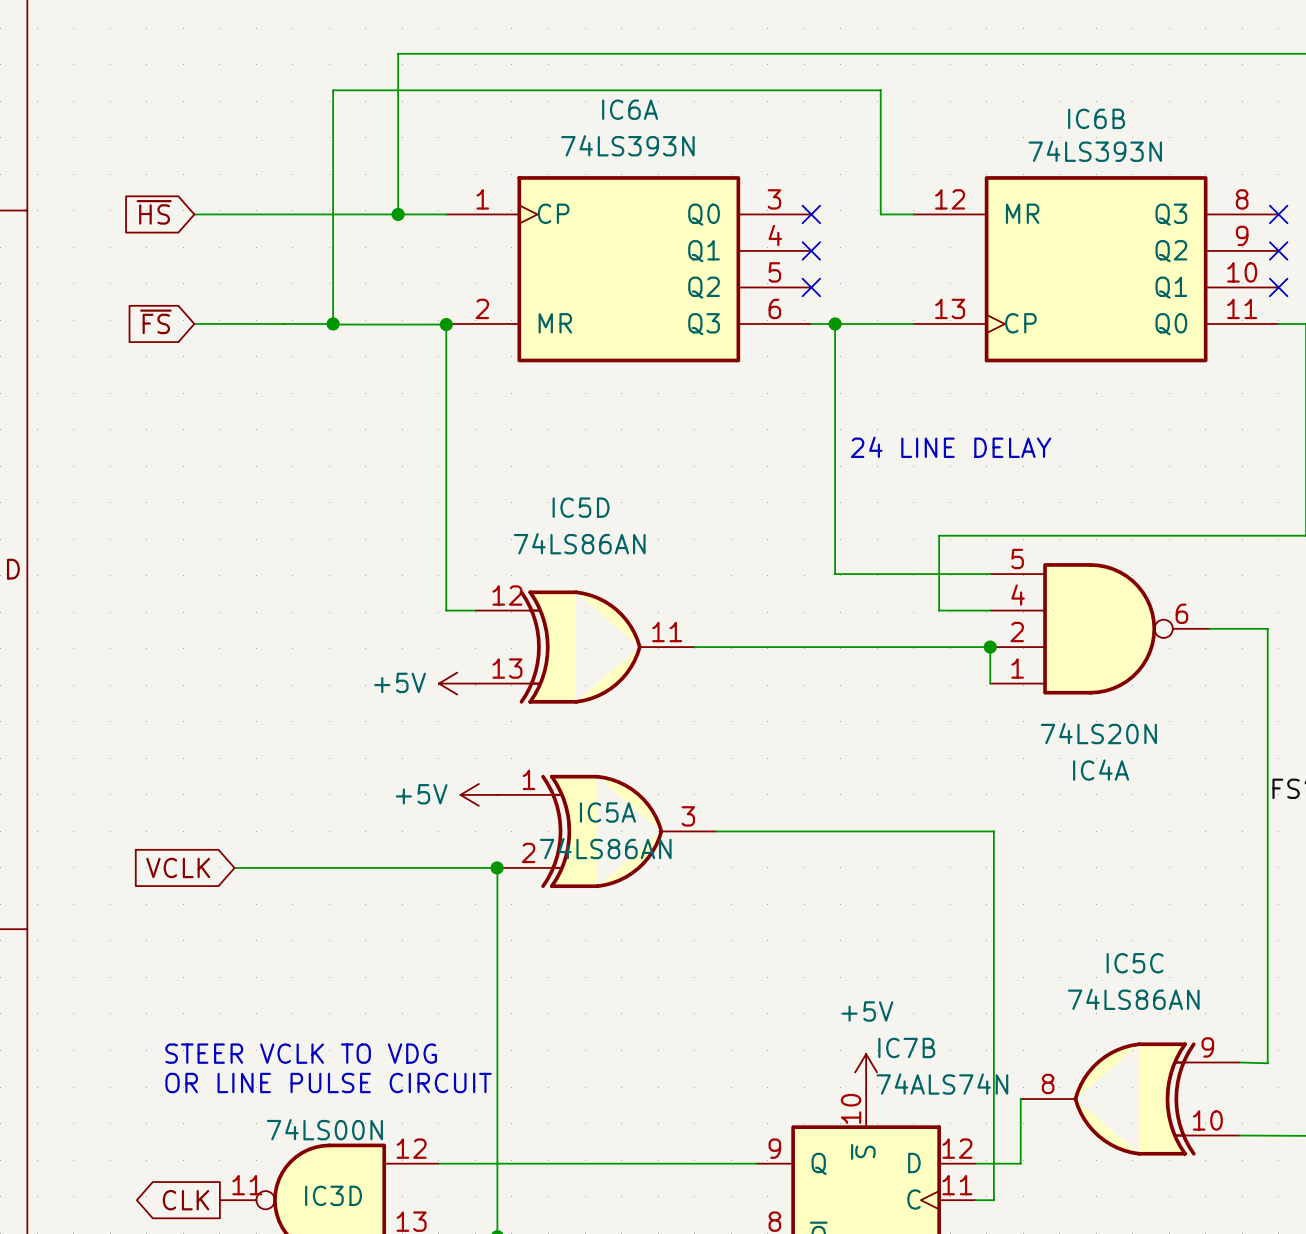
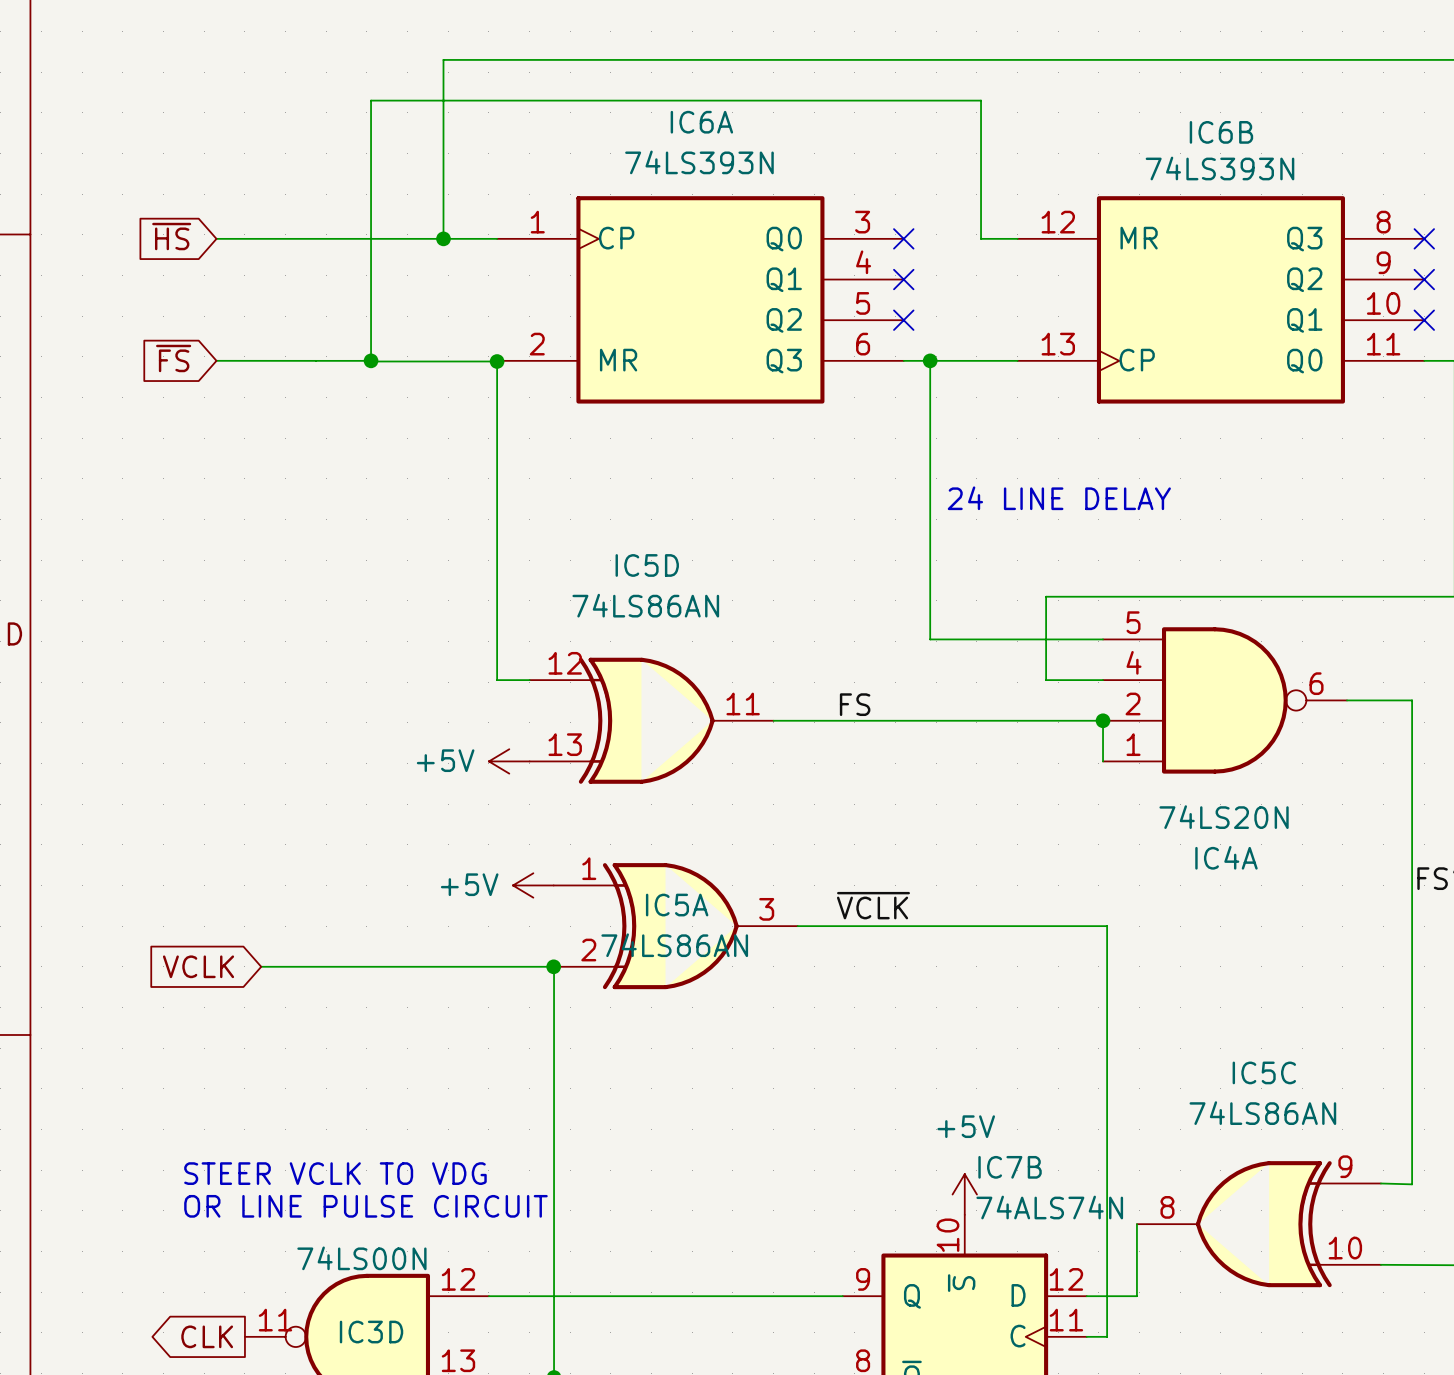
label: none -> FS (855, 704)
label: none -> ~{VCLK} (873, 905)

